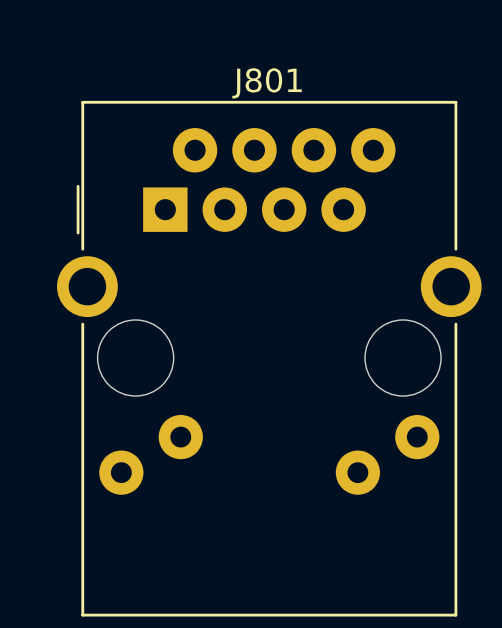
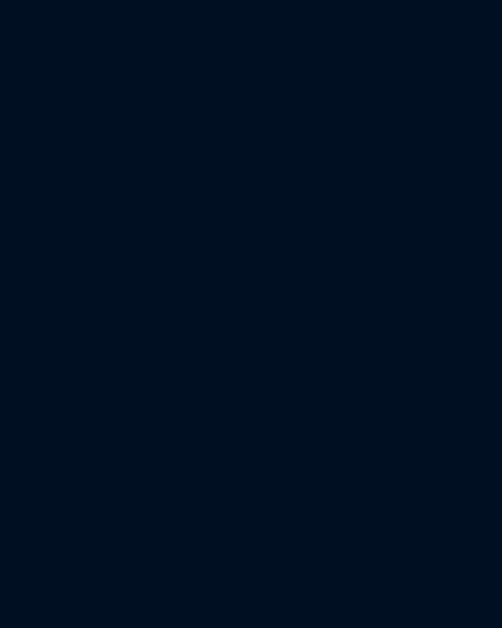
J801: (269, 358) -> none

